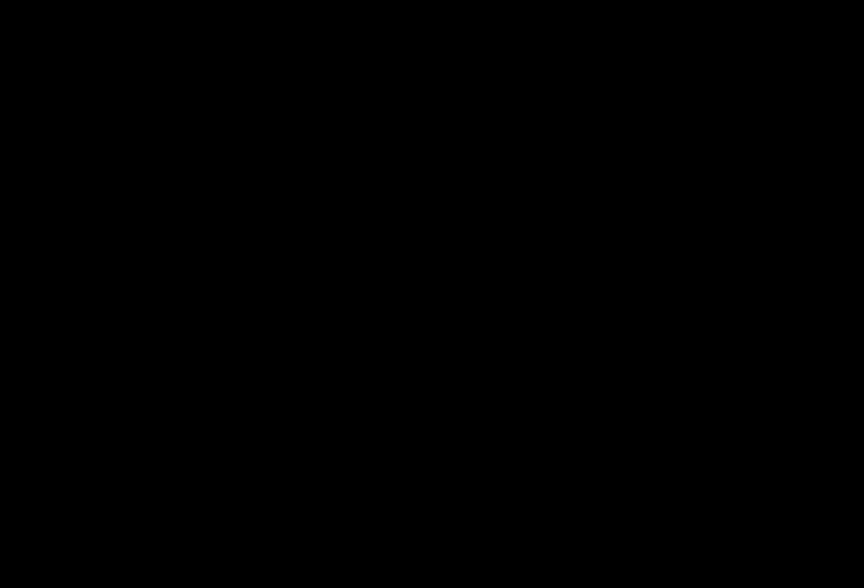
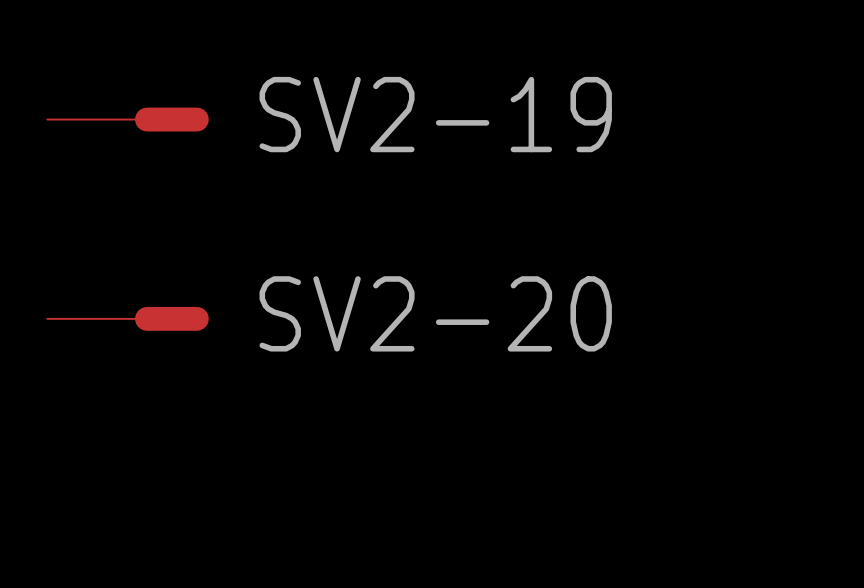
SV2-19: none -> (128, 119)
SV2-20: none -> (128, 318)

